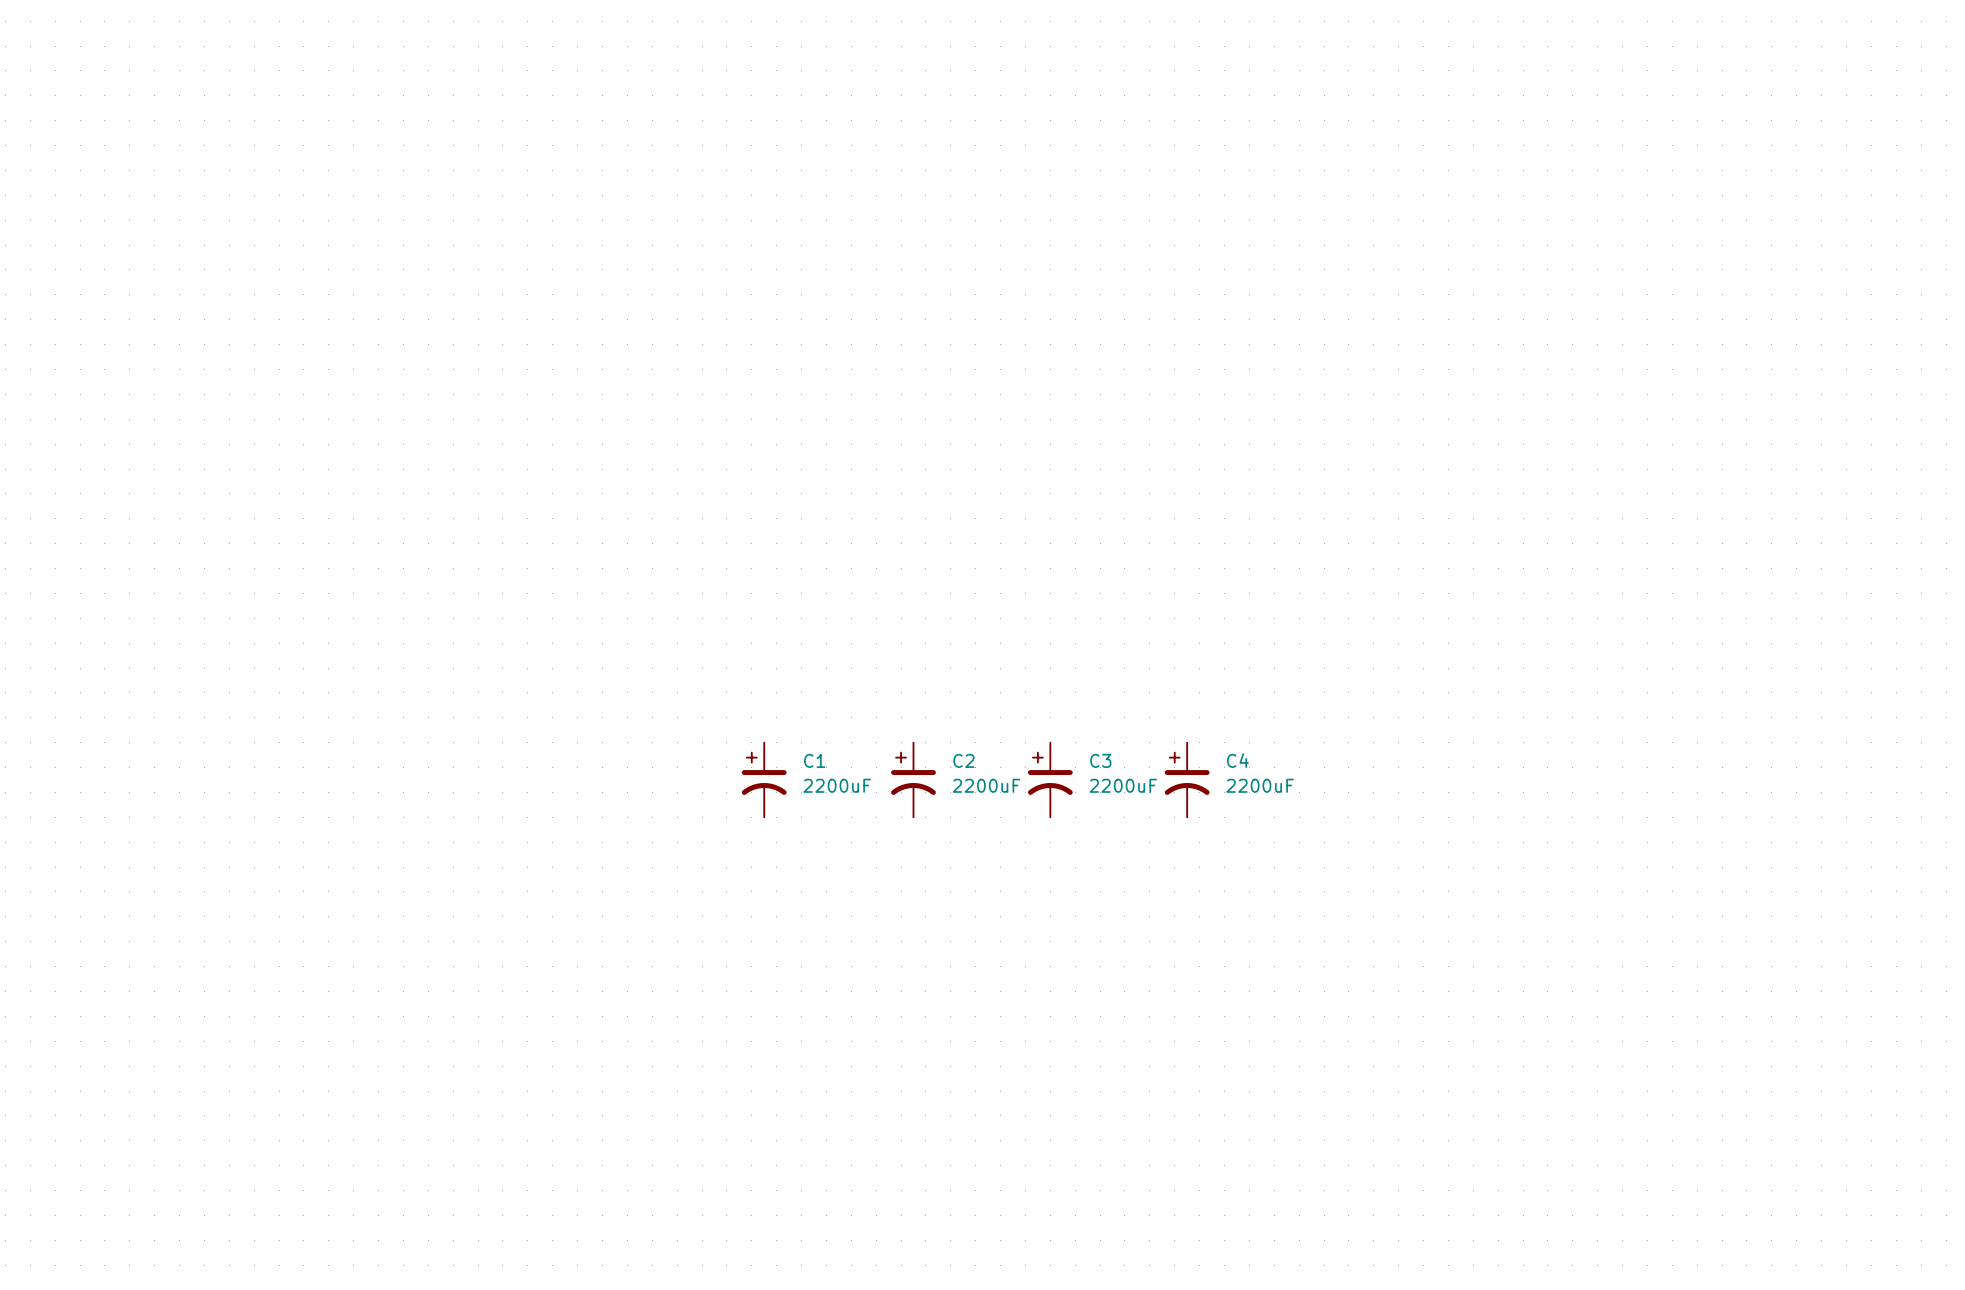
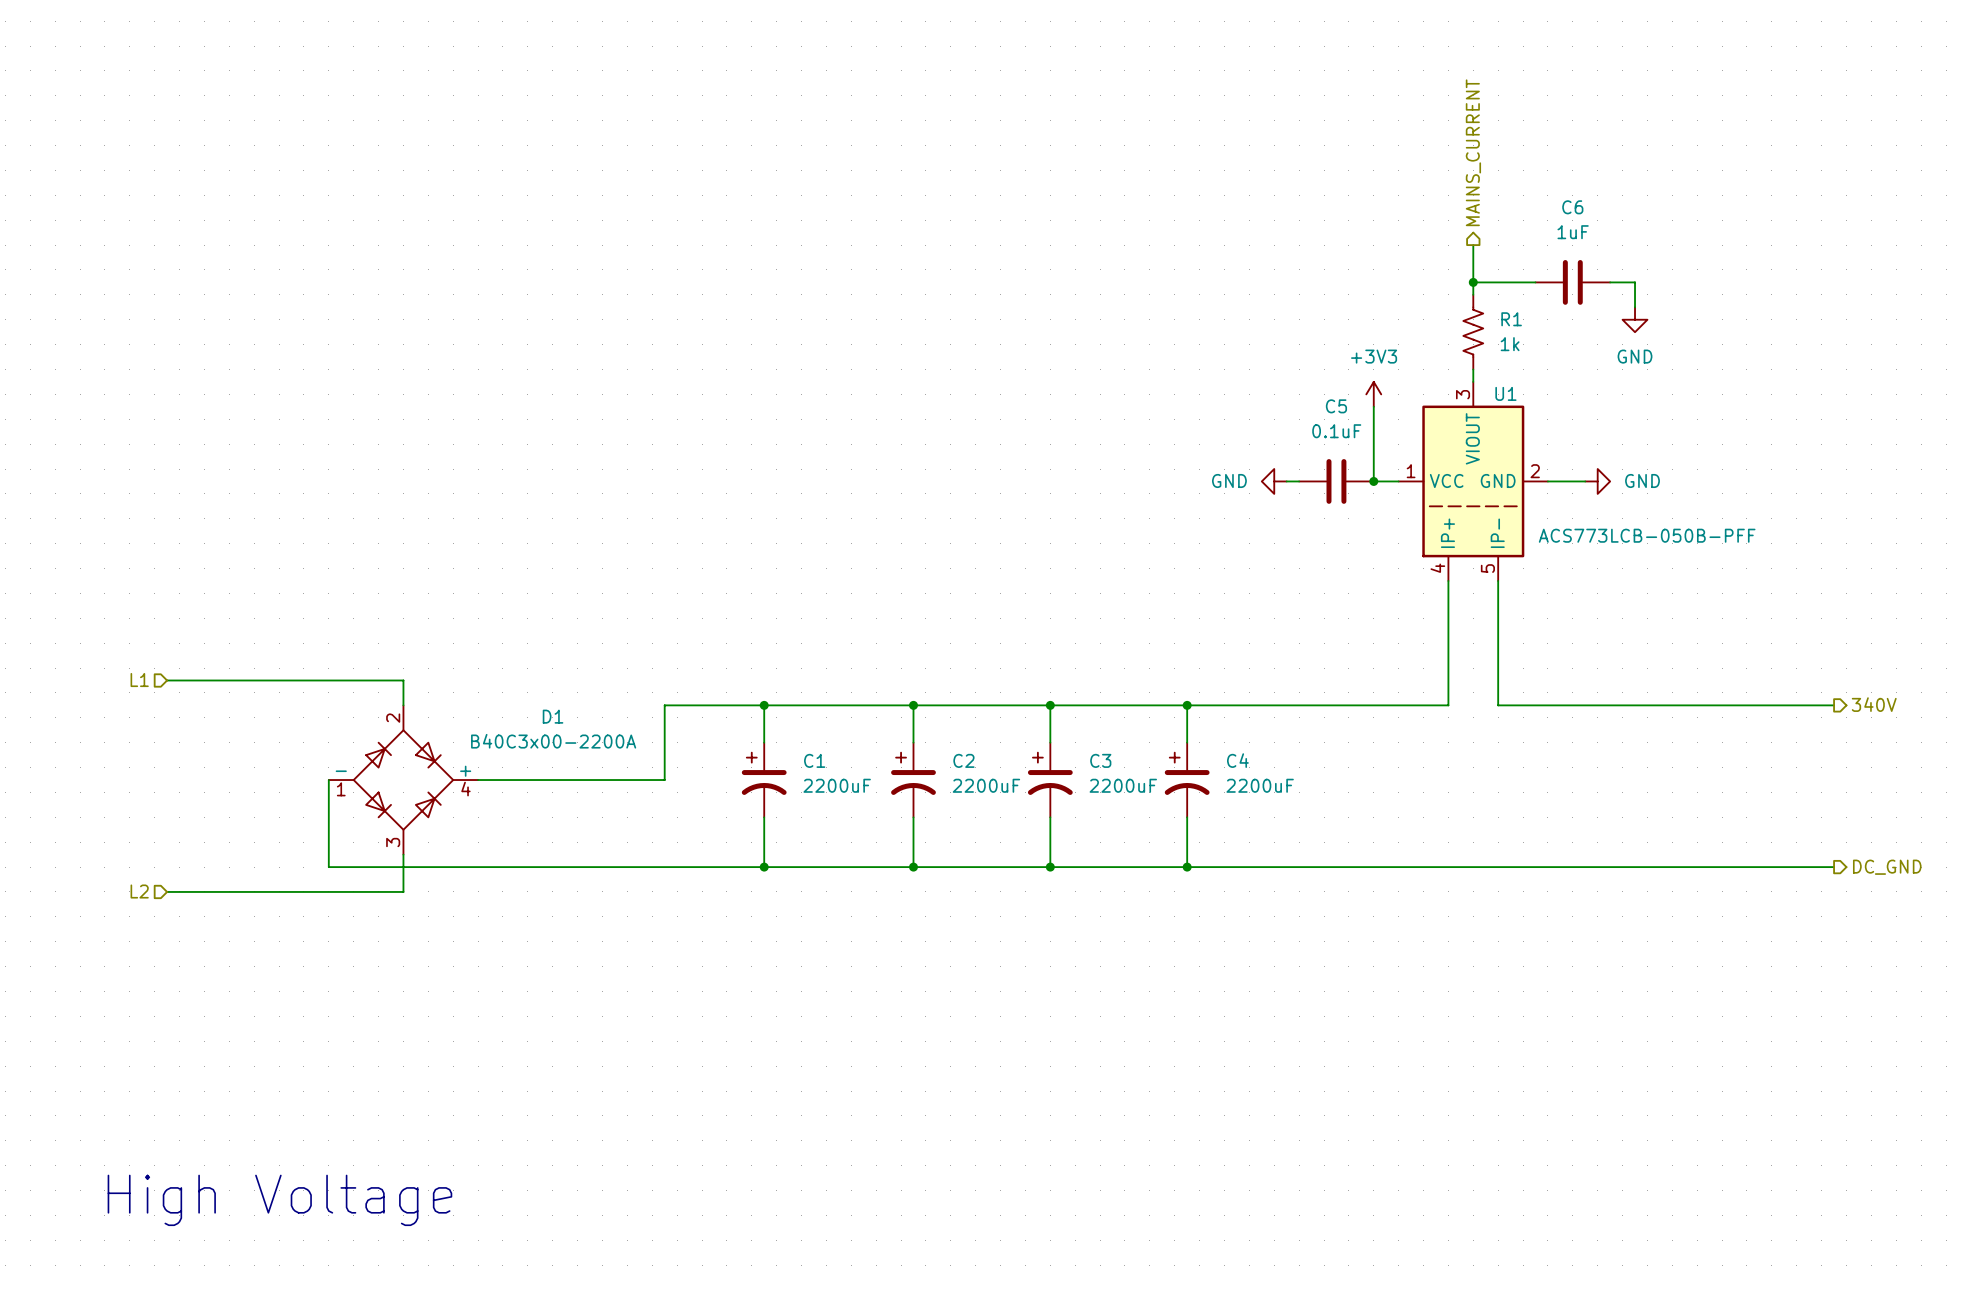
hierarchical label: none -> MAINS_CURRENT (1473, 152)
wire: none -> (1473, 245) (1473, 294)
wire: none -> (1473, 282) (1535, 282)
junction: none -> (1473, 282)
C6: none -> 1uF (1572, 282)
wire: none -> (1610, 282) (1635, 282) (1635, 307)
power symbol: none -> GND (1635, 319)
R1: none -> 1k (1473, 332)
wire: none -> (1473, 369) (1473, 381)
power symbol: none -> +3V3 (1373, 394)
wire: none -> (1373, 406) (1373, 481) (1398, 481)
power symbol: none -> GND (1274, 481)
wire: none -> (1286, 481) (1299, 481)
C5: none -> 0.1uF (1336, 481)
junction: none -> (1373, 481)
U1: none -> ACS773LCB-050B-PFF (1473, 481)
wire: none -> (1547, 481) (1585, 481)
power symbol: none -> GND (1597, 481)
wire: none -> (1448, 580) (1448, 705) (664, 705) (664, 780) (478, 780)
wire: none -> (1498, 580) (1498, 705) (1834, 705)
hierarchical label: none -> L1 (139, 680)
wire: none -> (167, 680) (403, 680) (403, 705)
hierarchical label: none -> 340V (1874, 704)
wire: none -> (764, 705) (764, 742)
junction: none -> (764, 705)
wire: none -> (913, 705) (913, 742)
junction: none -> (913, 705)
wire: none -> (1050, 705) (1050, 742)
junction: none -> (1050, 705)
wire: none -> (1187, 705) (1187, 742)
junction: none -> (1187, 705)
wire: none -> (328, 780) (328, 867) (1834, 867)
D1: none -> B40C3x00-2200A (403, 780)
wire: none -> (764, 817) (764, 867)
wire: none -> (913, 817) (913, 867)
wire: none -> (1050, 817) (1050, 867)
wire: none -> (1187, 817) (1187, 867)
wire: none -> (403, 854) (403, 891) (167, 891)
junction: none -> (764, 867)
junction: none -> (913, 867)
junction: none -> (1050, 867)
junction: none -> (1187, 867)
hierarchical label: none -> DC_GND (1887, 867)
hierarchical label: none -> L2 (139, 891)
text: none -> High Voltage (279, 1200)

